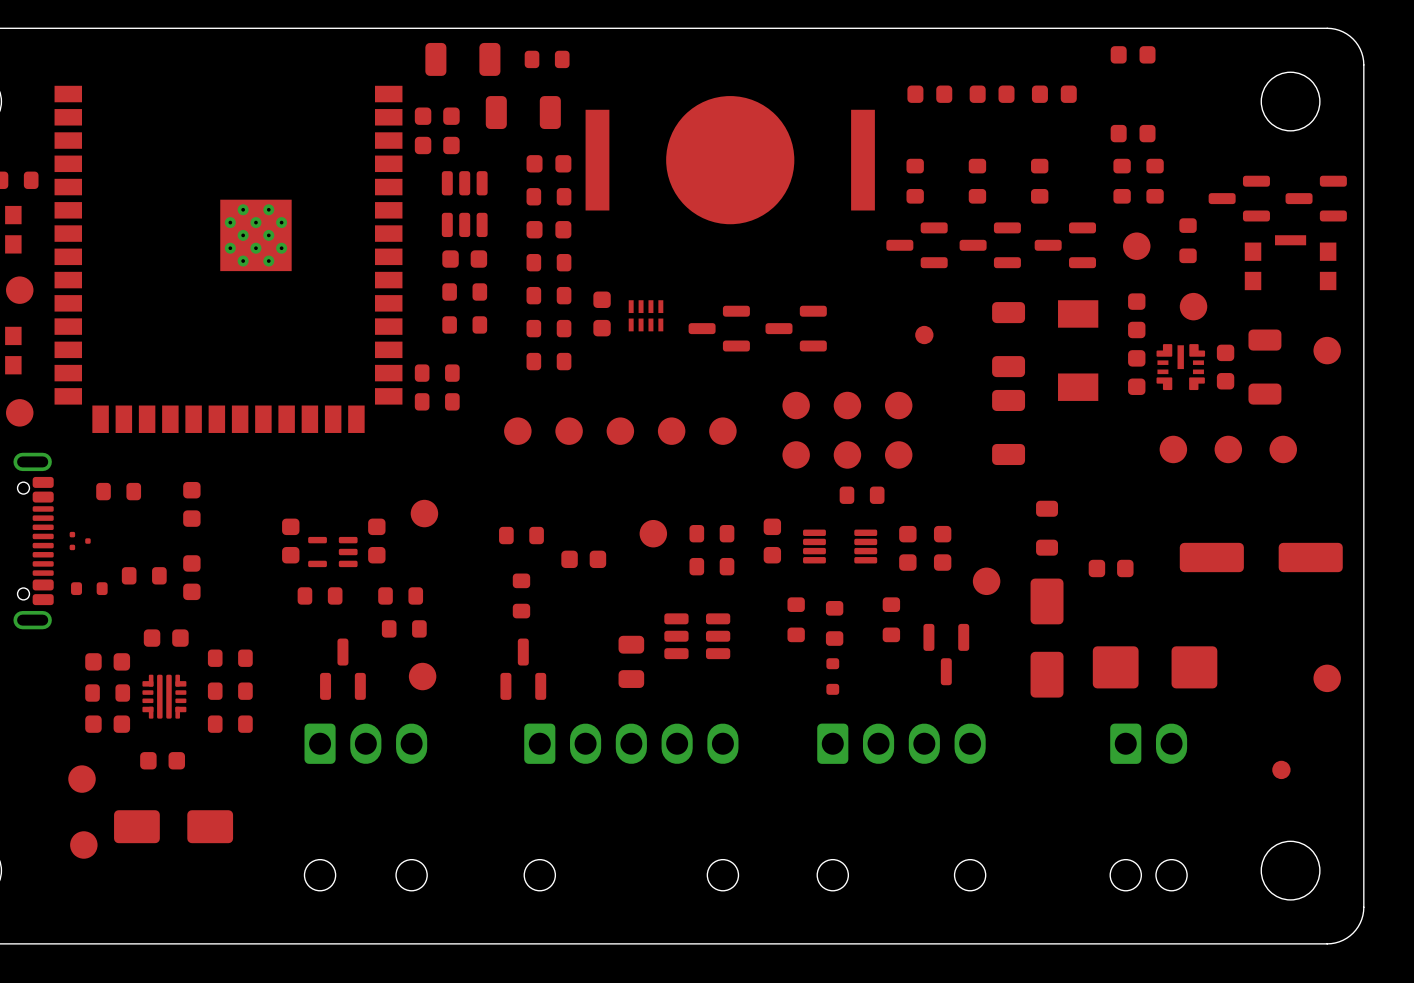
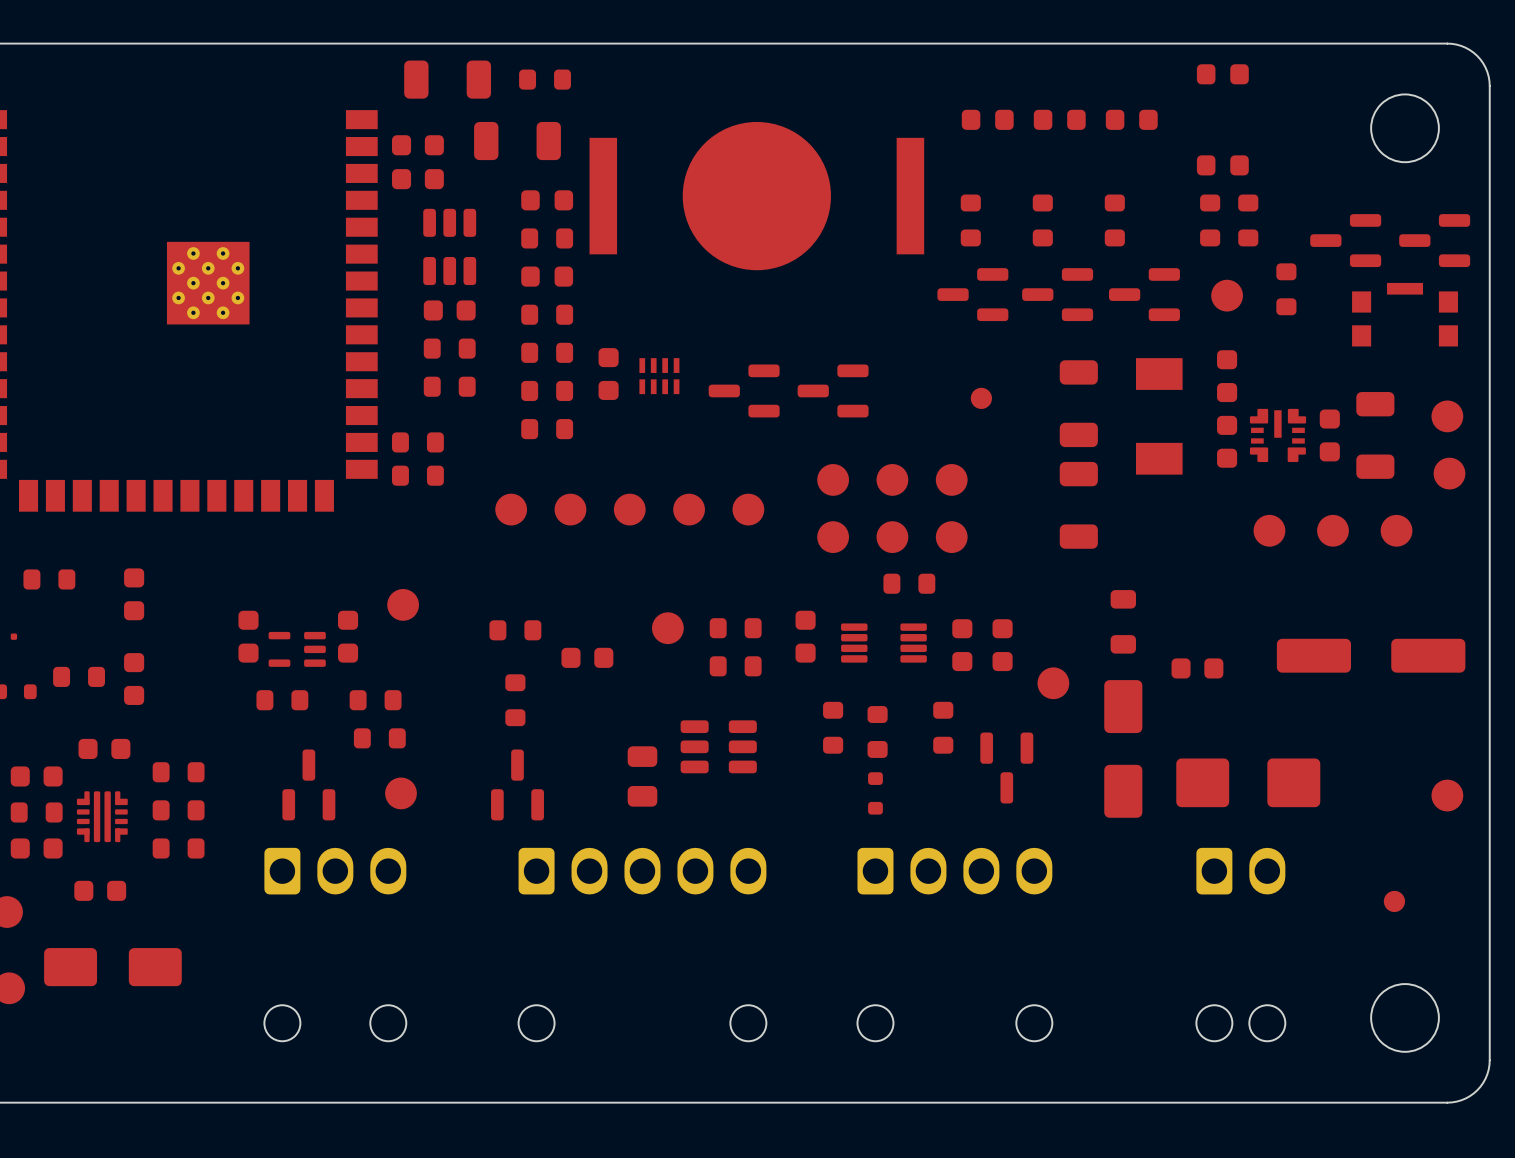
part position: (1193, 306) -> (1449, 473)

